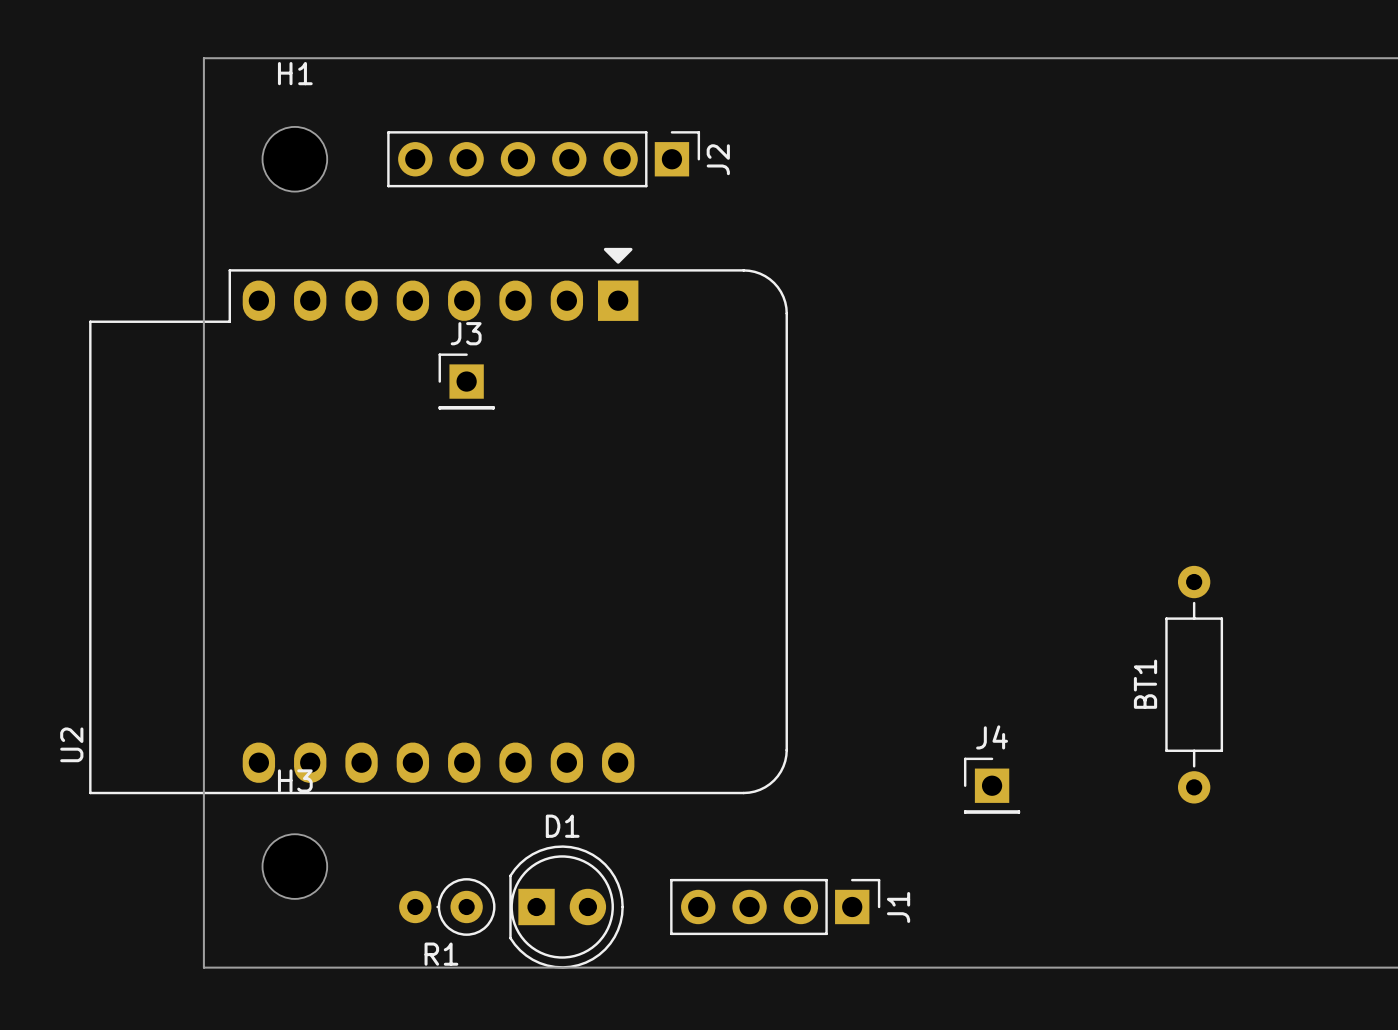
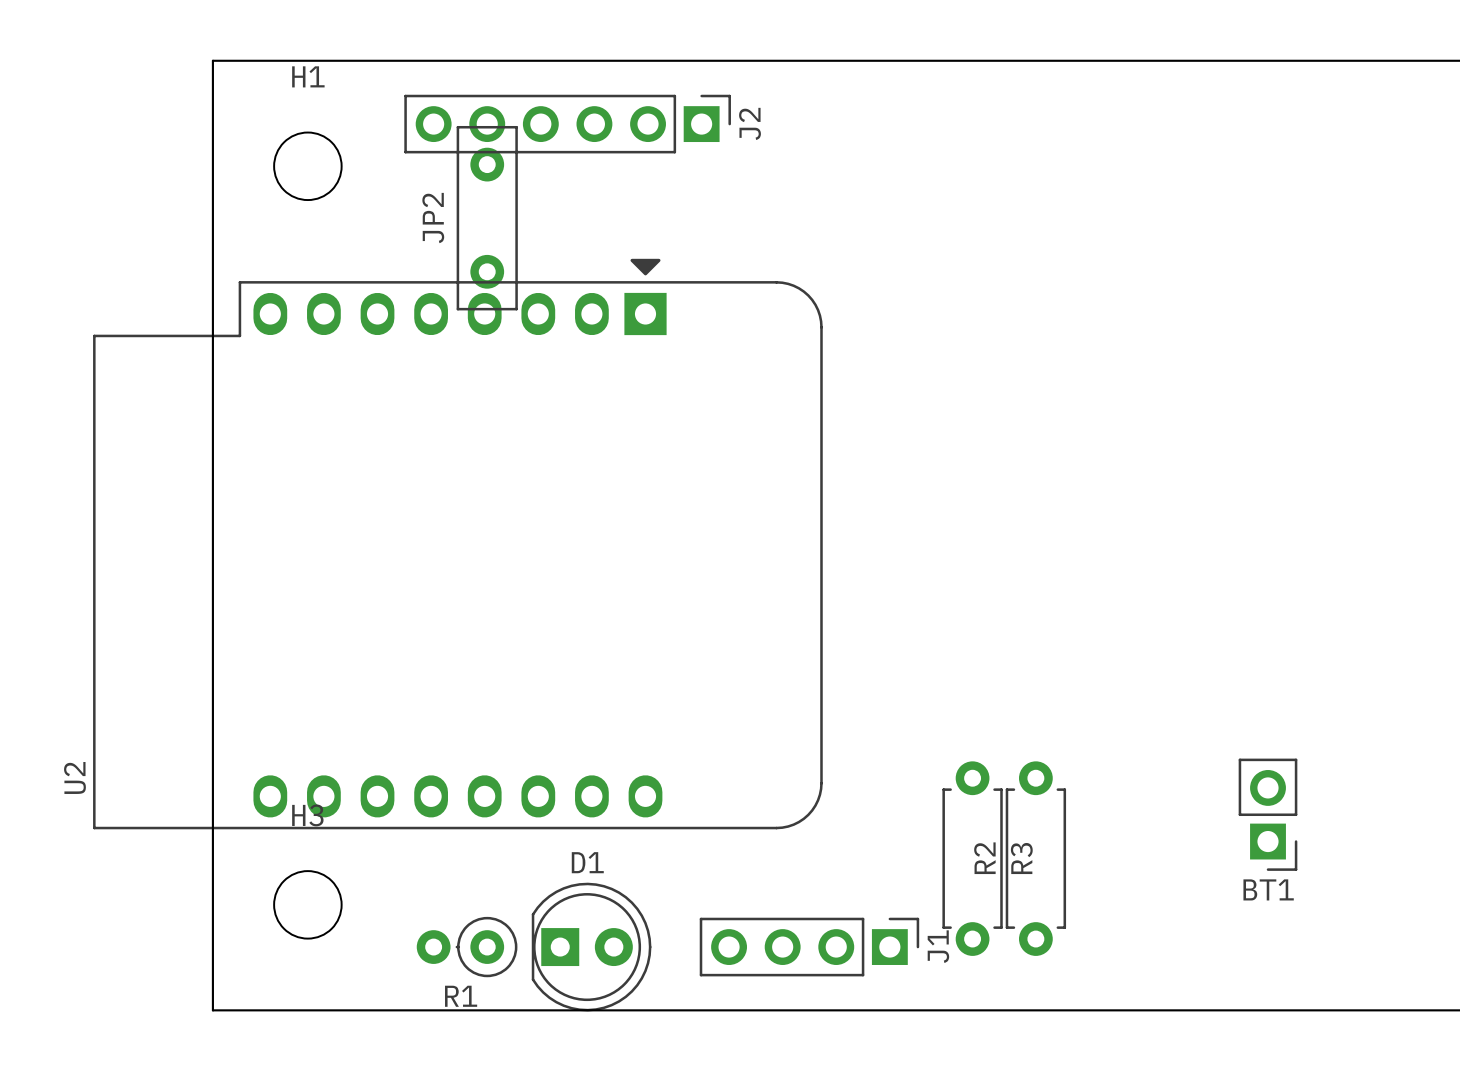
J2 position: (543, 159) -> (567, 124)
JP2: none -> (487, 218)
J3: (466, 381) -> none
BT1 footprint: [1165, 565, 1224, 804] -> [1238, 758, 1298, 871]
BT1 name position: BT1 (1145, 684) -> BT1 (1268, 889)
J4: (992, 785) -> none
R3: none -> (972, 858)
R2: none -> (1035, 858)

